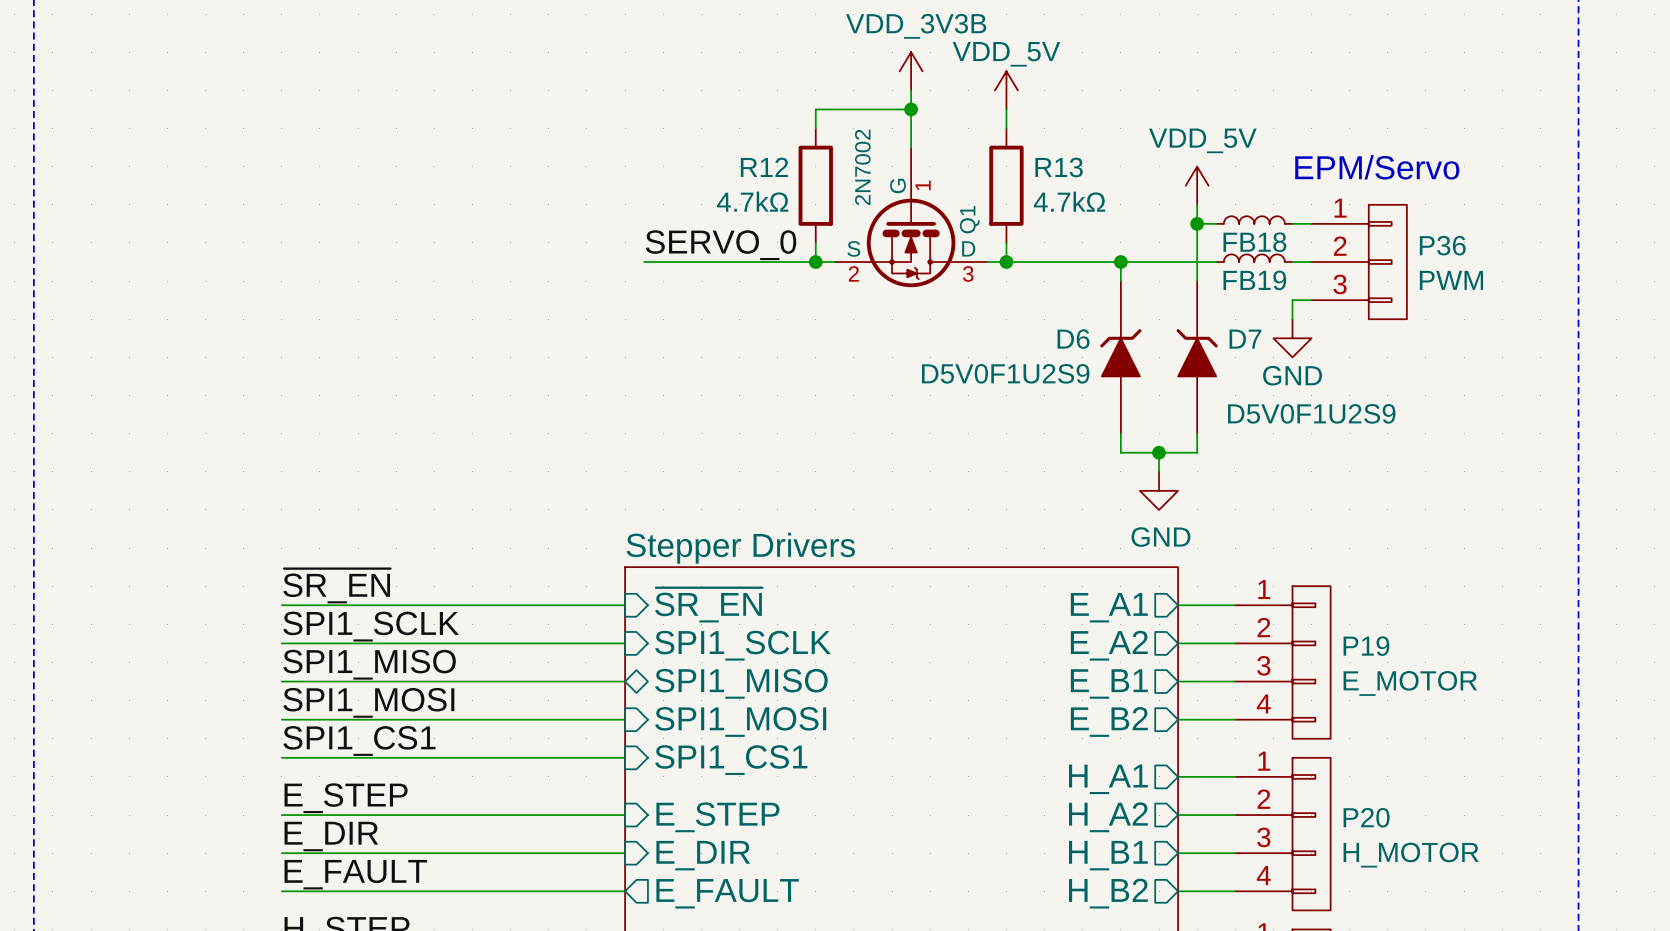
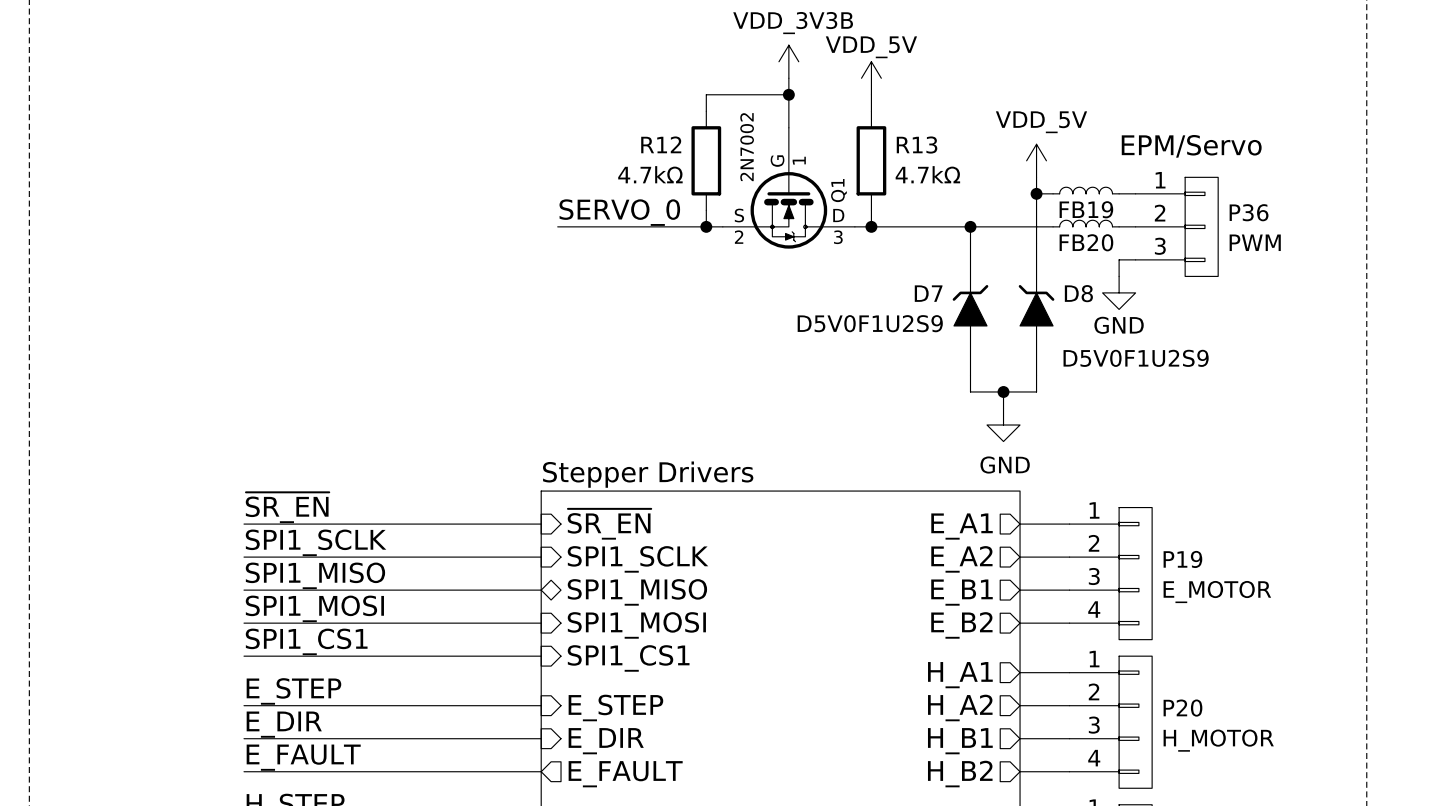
FB18 name: FB18 (1254, 242) -> FB19 (1086, 209)
FB19 name: FB19 (1254, 280) -> FB20 (1086, 242)
D6 name: D6 (1073, 339) -> D7 (928, 293)
D7 name: D7 (1245, 339) -> D8 (1078, 293)

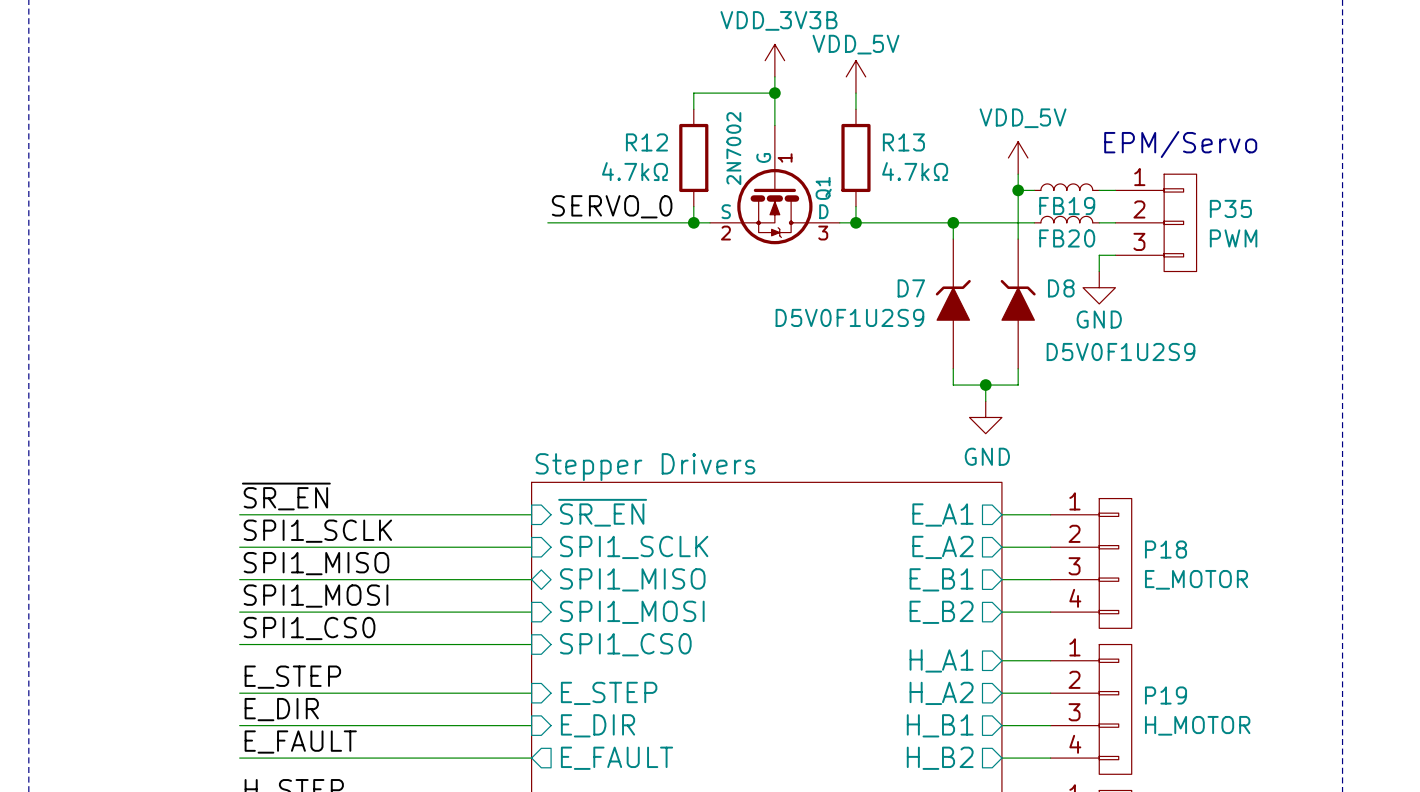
P36 name: P36 (1249, 212) -> P35 (1230, 208)
P19 name: P19 (1182, 559) -> P18 (1166, 549)
label: SPI1_CS1 (306, 641) -> SPI1_CS0 (309, 628)
sheet pin: SPI1_CS1 (628, 658) -> SPI1_CS0 (625, 644)
P20 name: P20 (1182, 708) -> P19 (1166, 695)

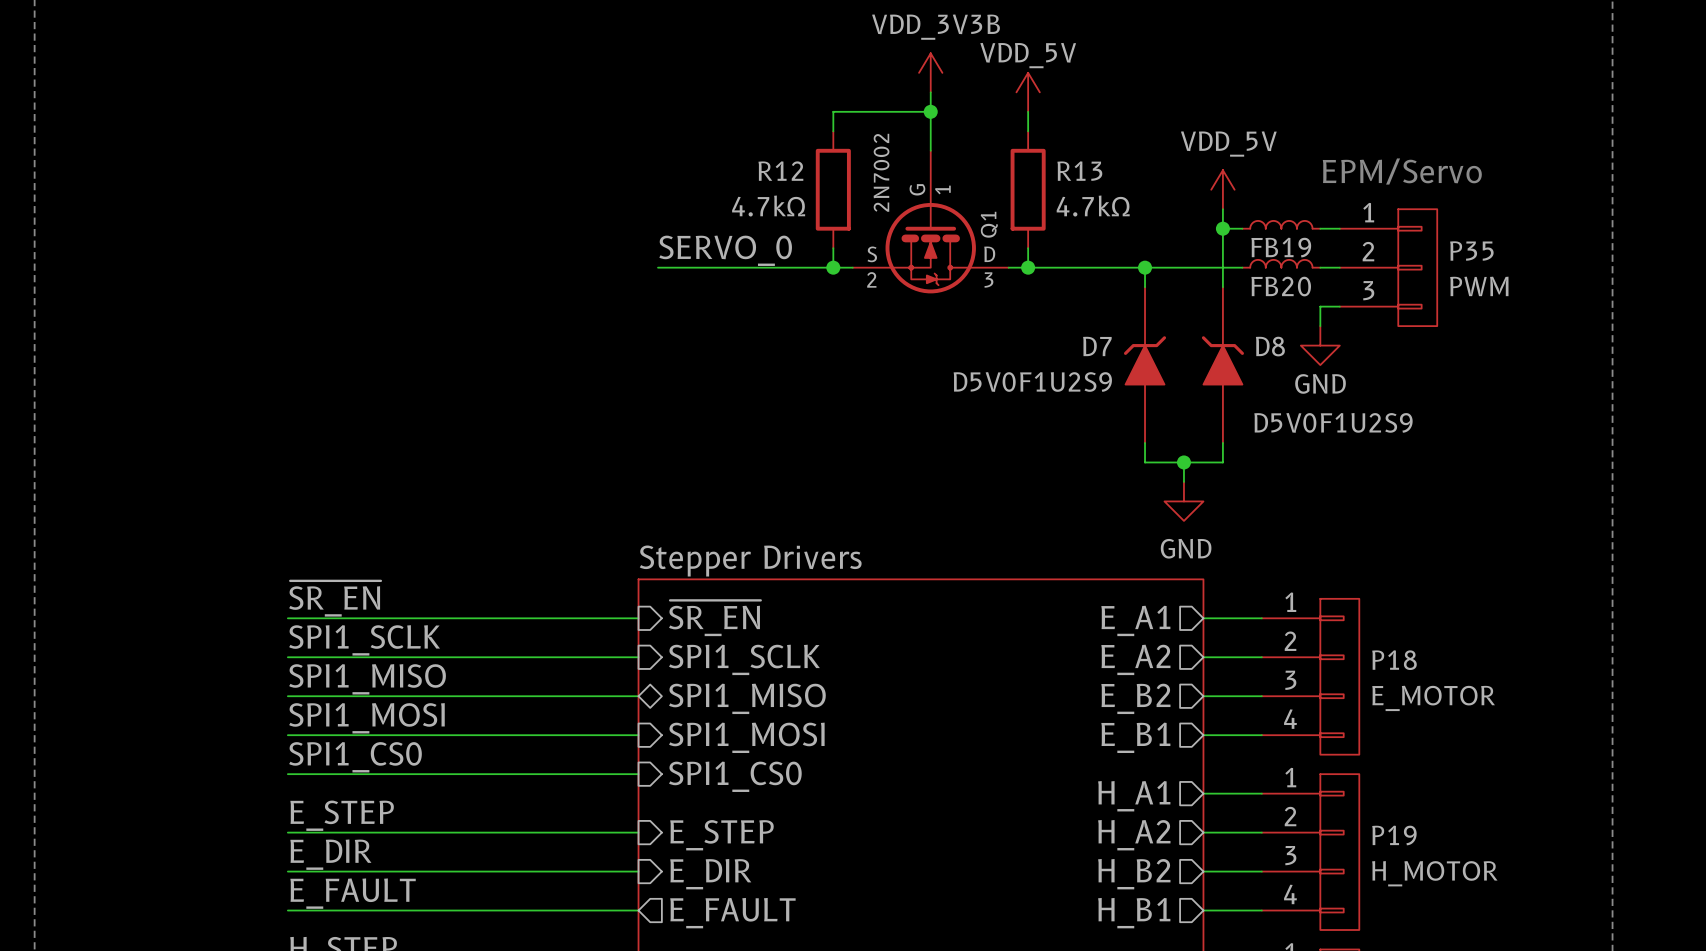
sheet pin: E_B1 (941, 579) -> E_B2 (1135, 698)
sheet pin: E_B2 (941, 612) -> E_B1 (1135, 737)
sheet pin: H_B1 (940, 725) -> H_B2 (1134, 874)
sheet pin: H_B2 (940, 758) -> H_B1 (1134, 913)

